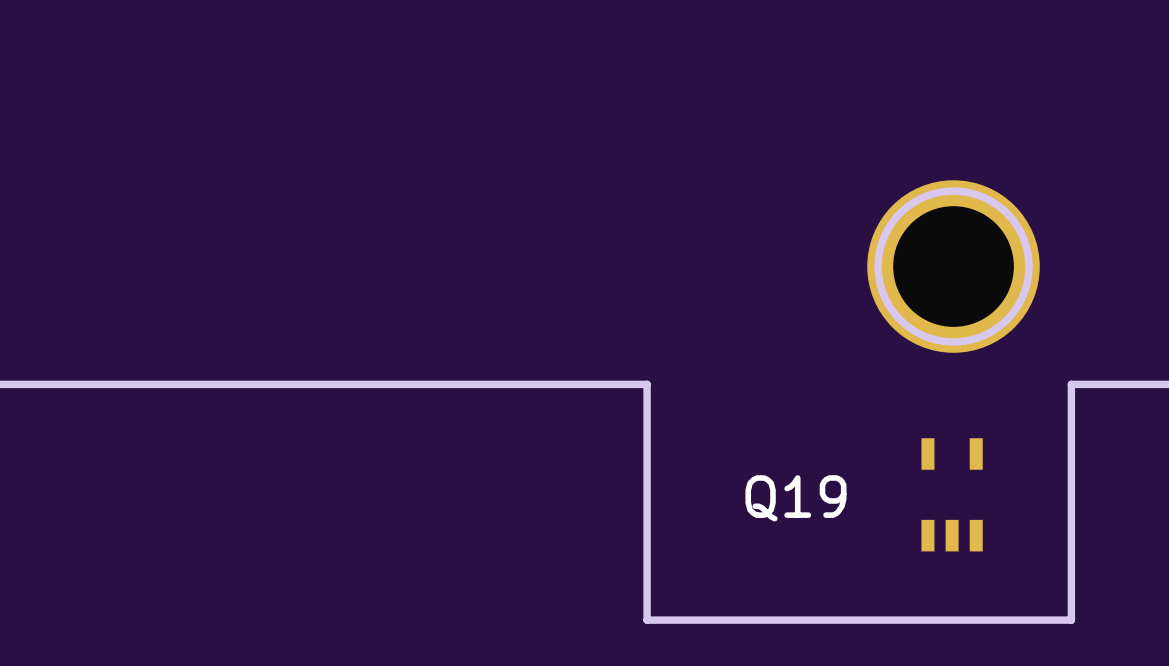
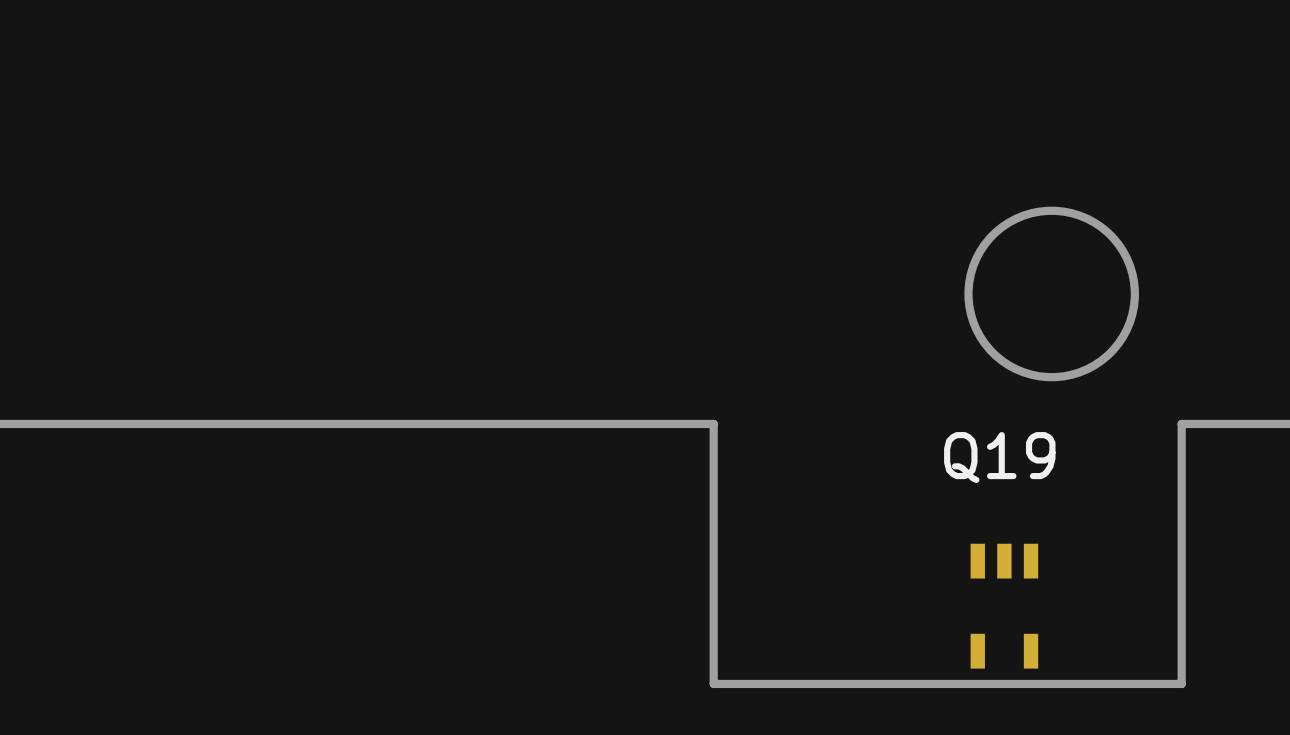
part: (953, 266) -> none
Q19 rotation: 0° (952, 494) -> 180° (1004, 606)
Q19 position: (952, 494) -> (1004, 606)
Q19 name position: Q19 (795, 498) -> Q19 (999, 457)

